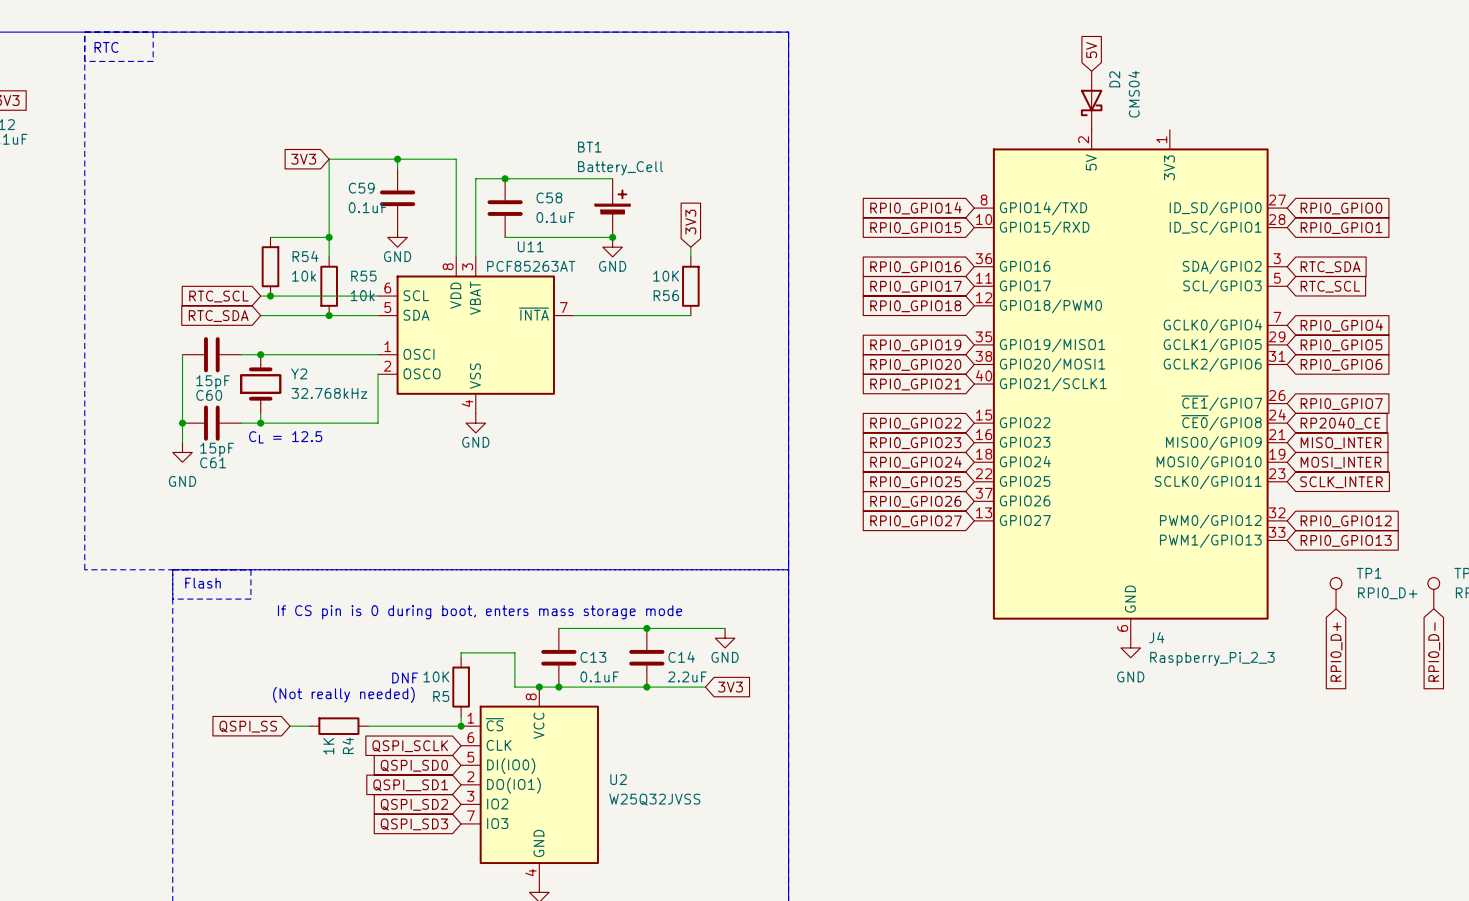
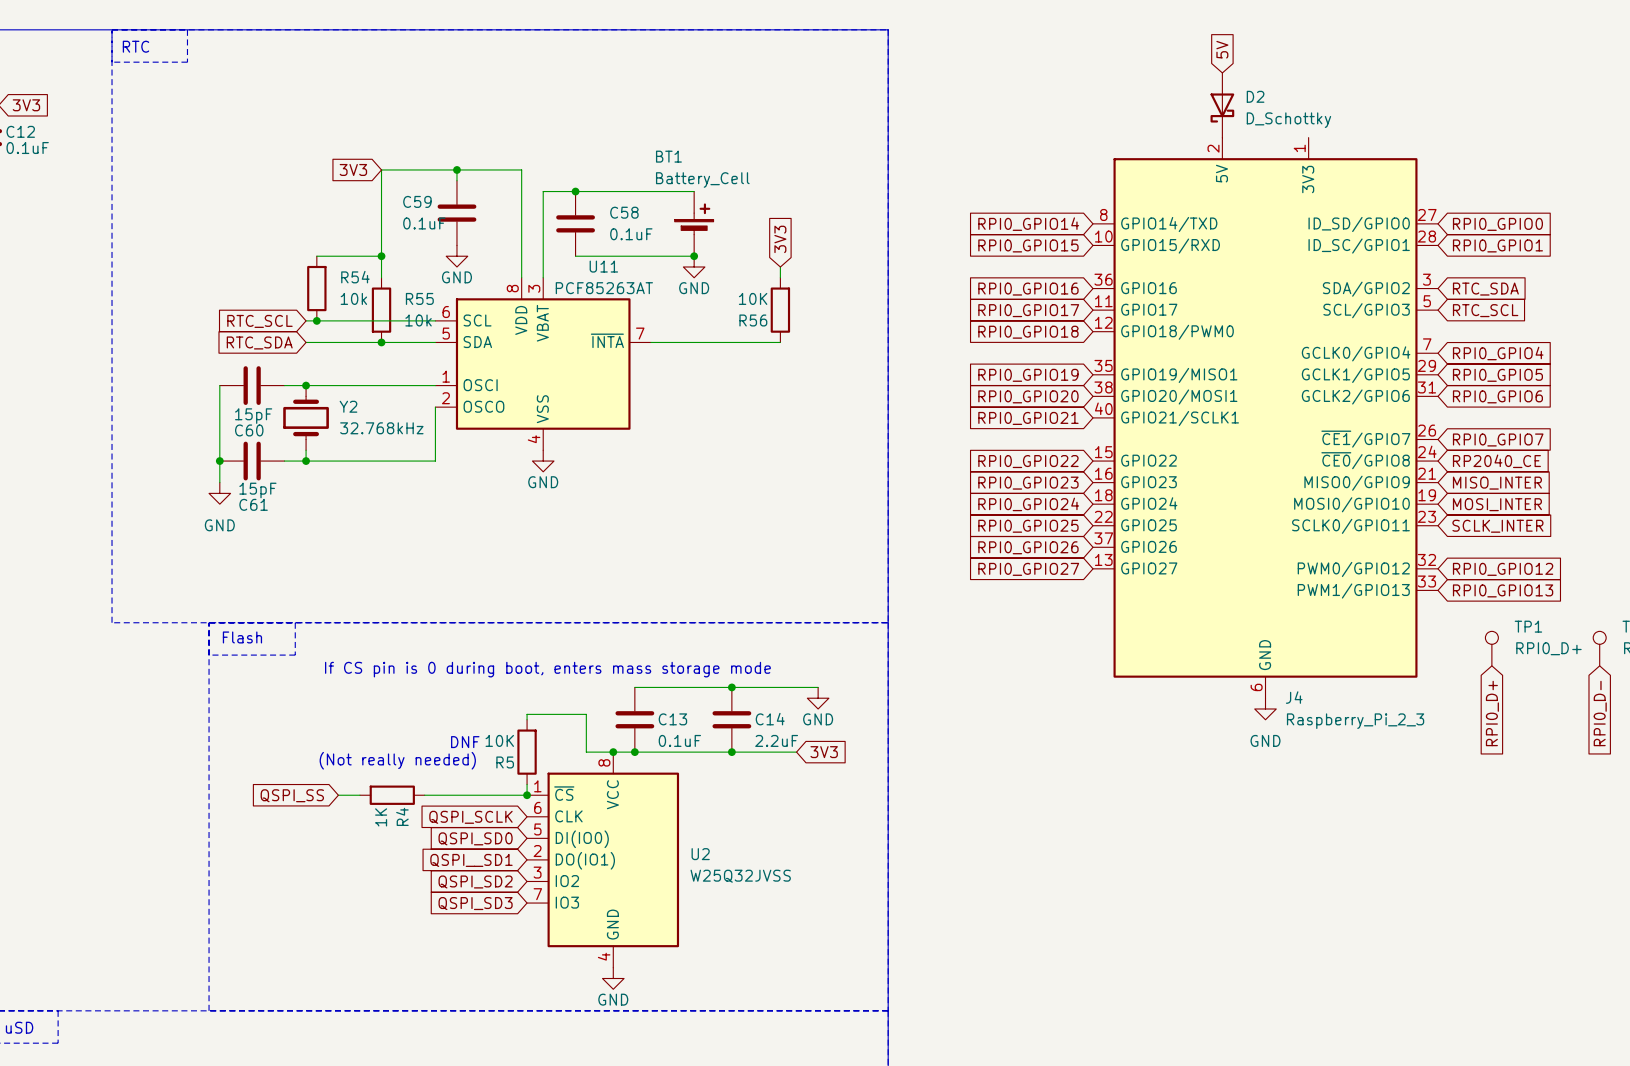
D2 name rotation: 0° (1114, 79) -> 90° clockwise (1255, 96)
D2 value: CMS04 (1134, 94) -> D_Schottky (1288, 120)
text: CL = 12.5 (285, 437) -> none

